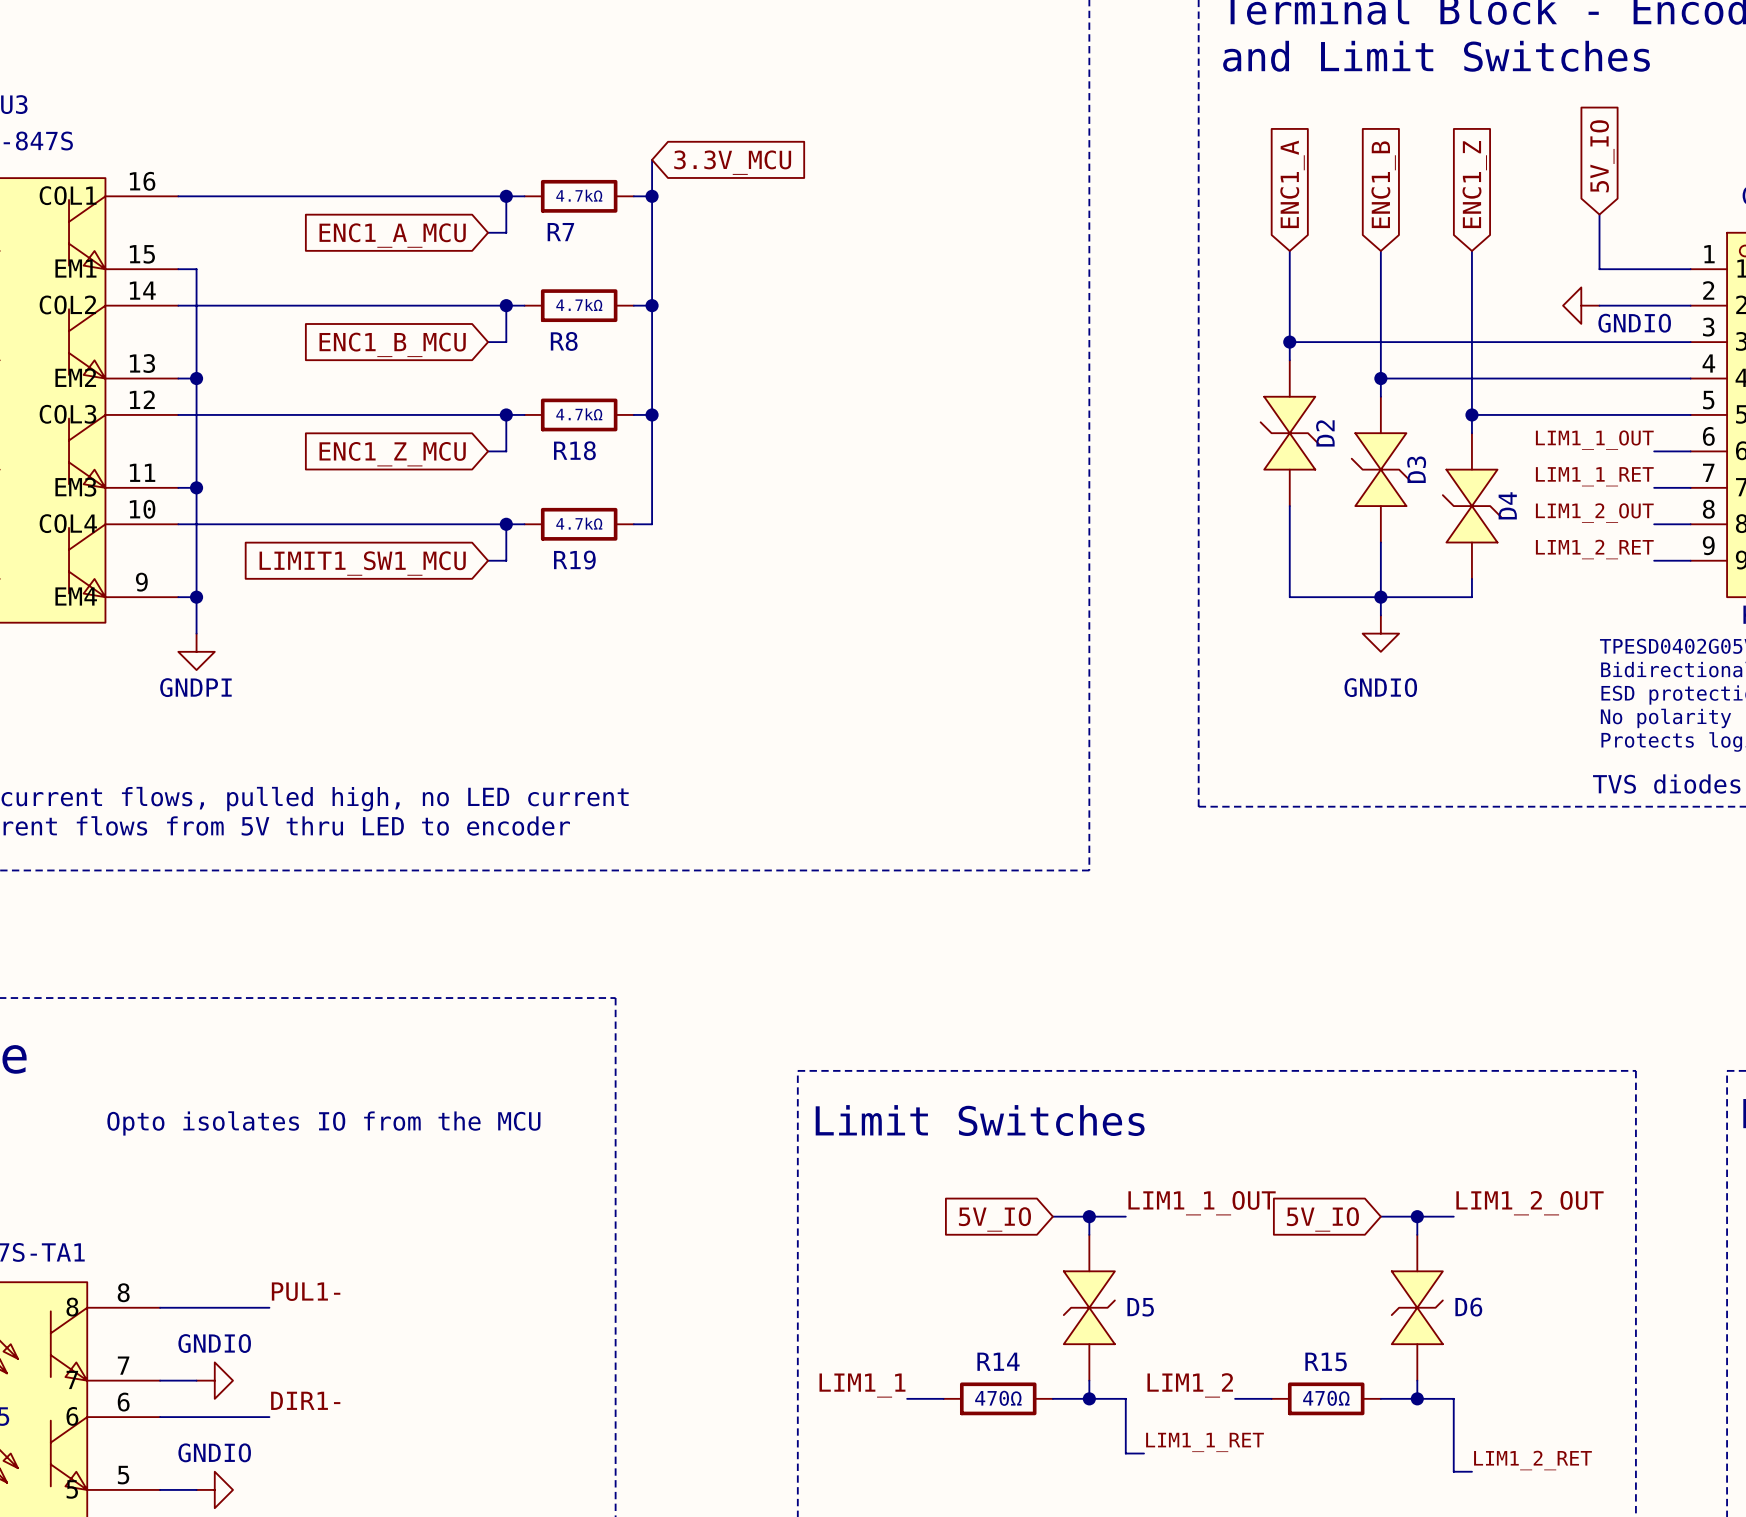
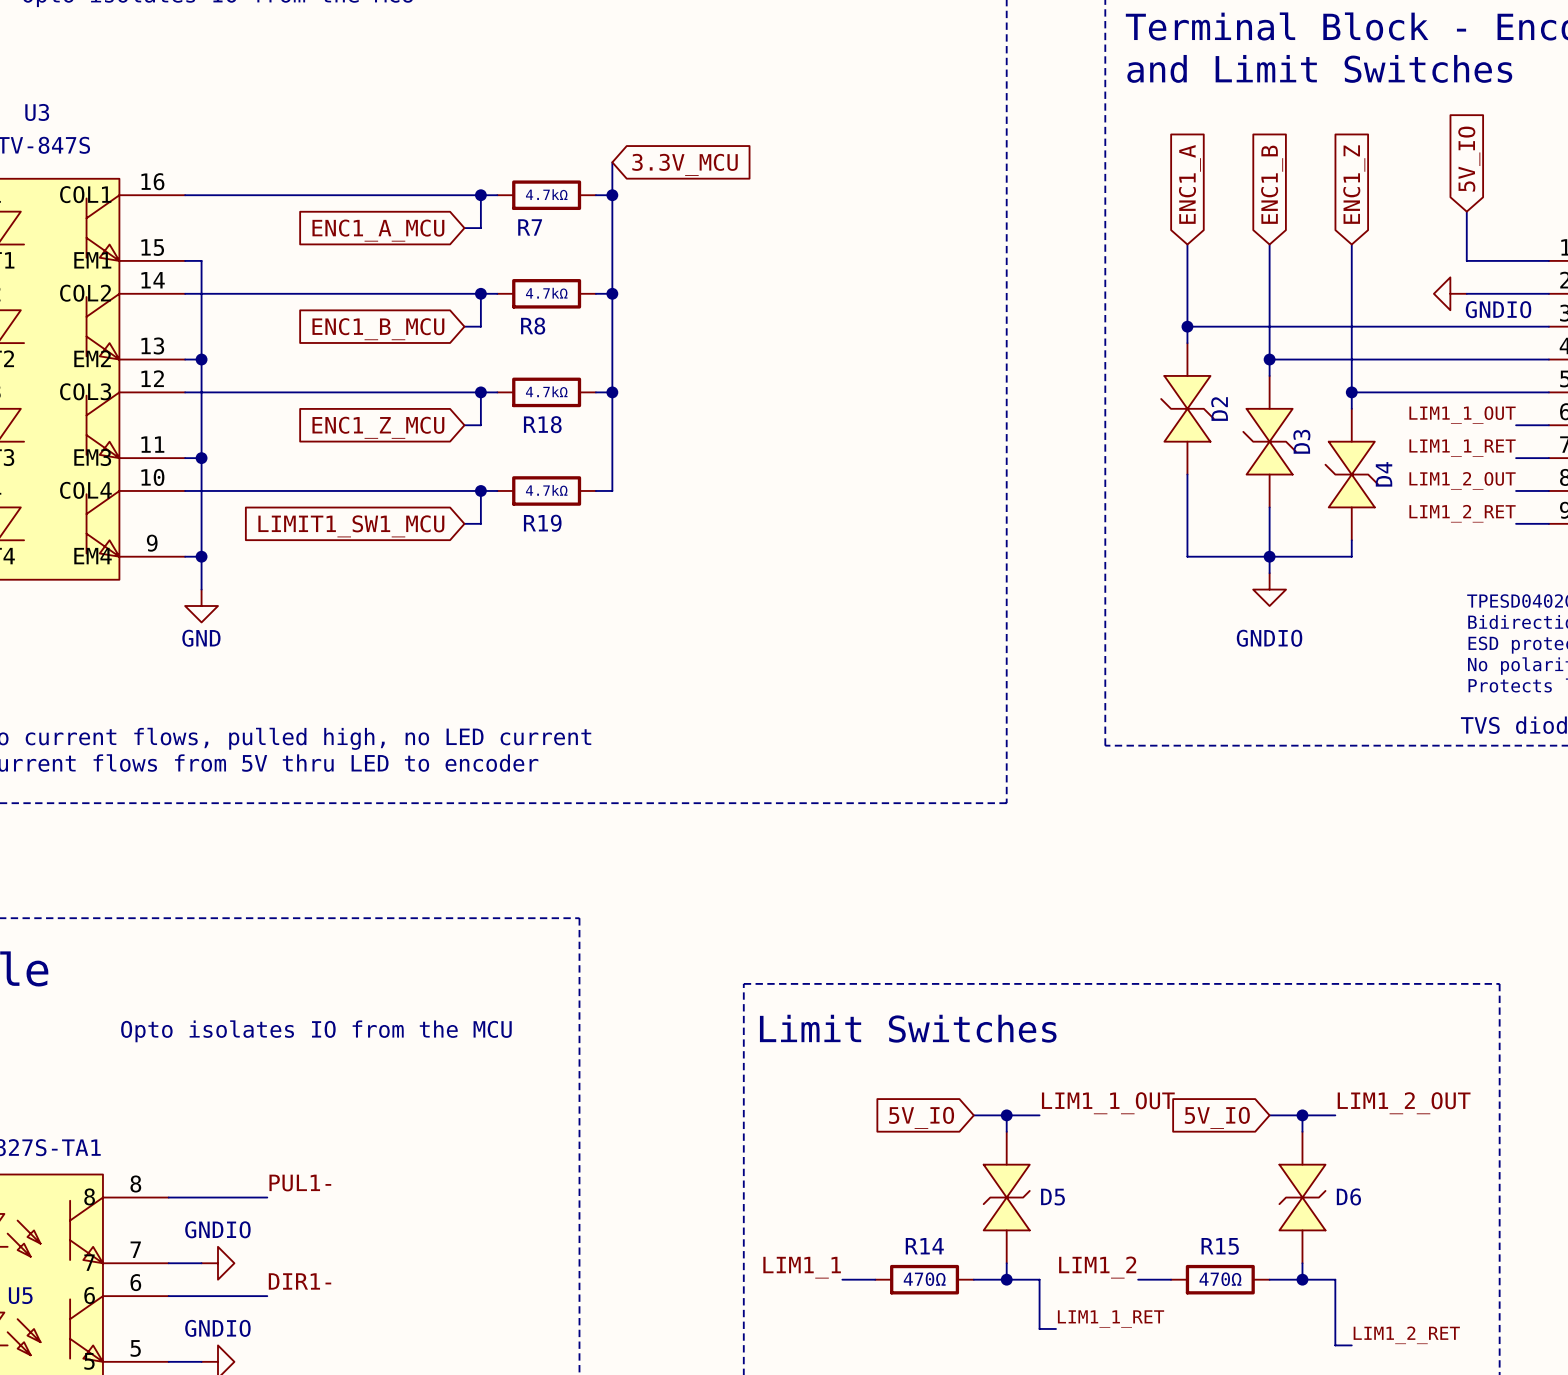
power symbol: GNDPI (196, 651) -> GND (201, 606)

